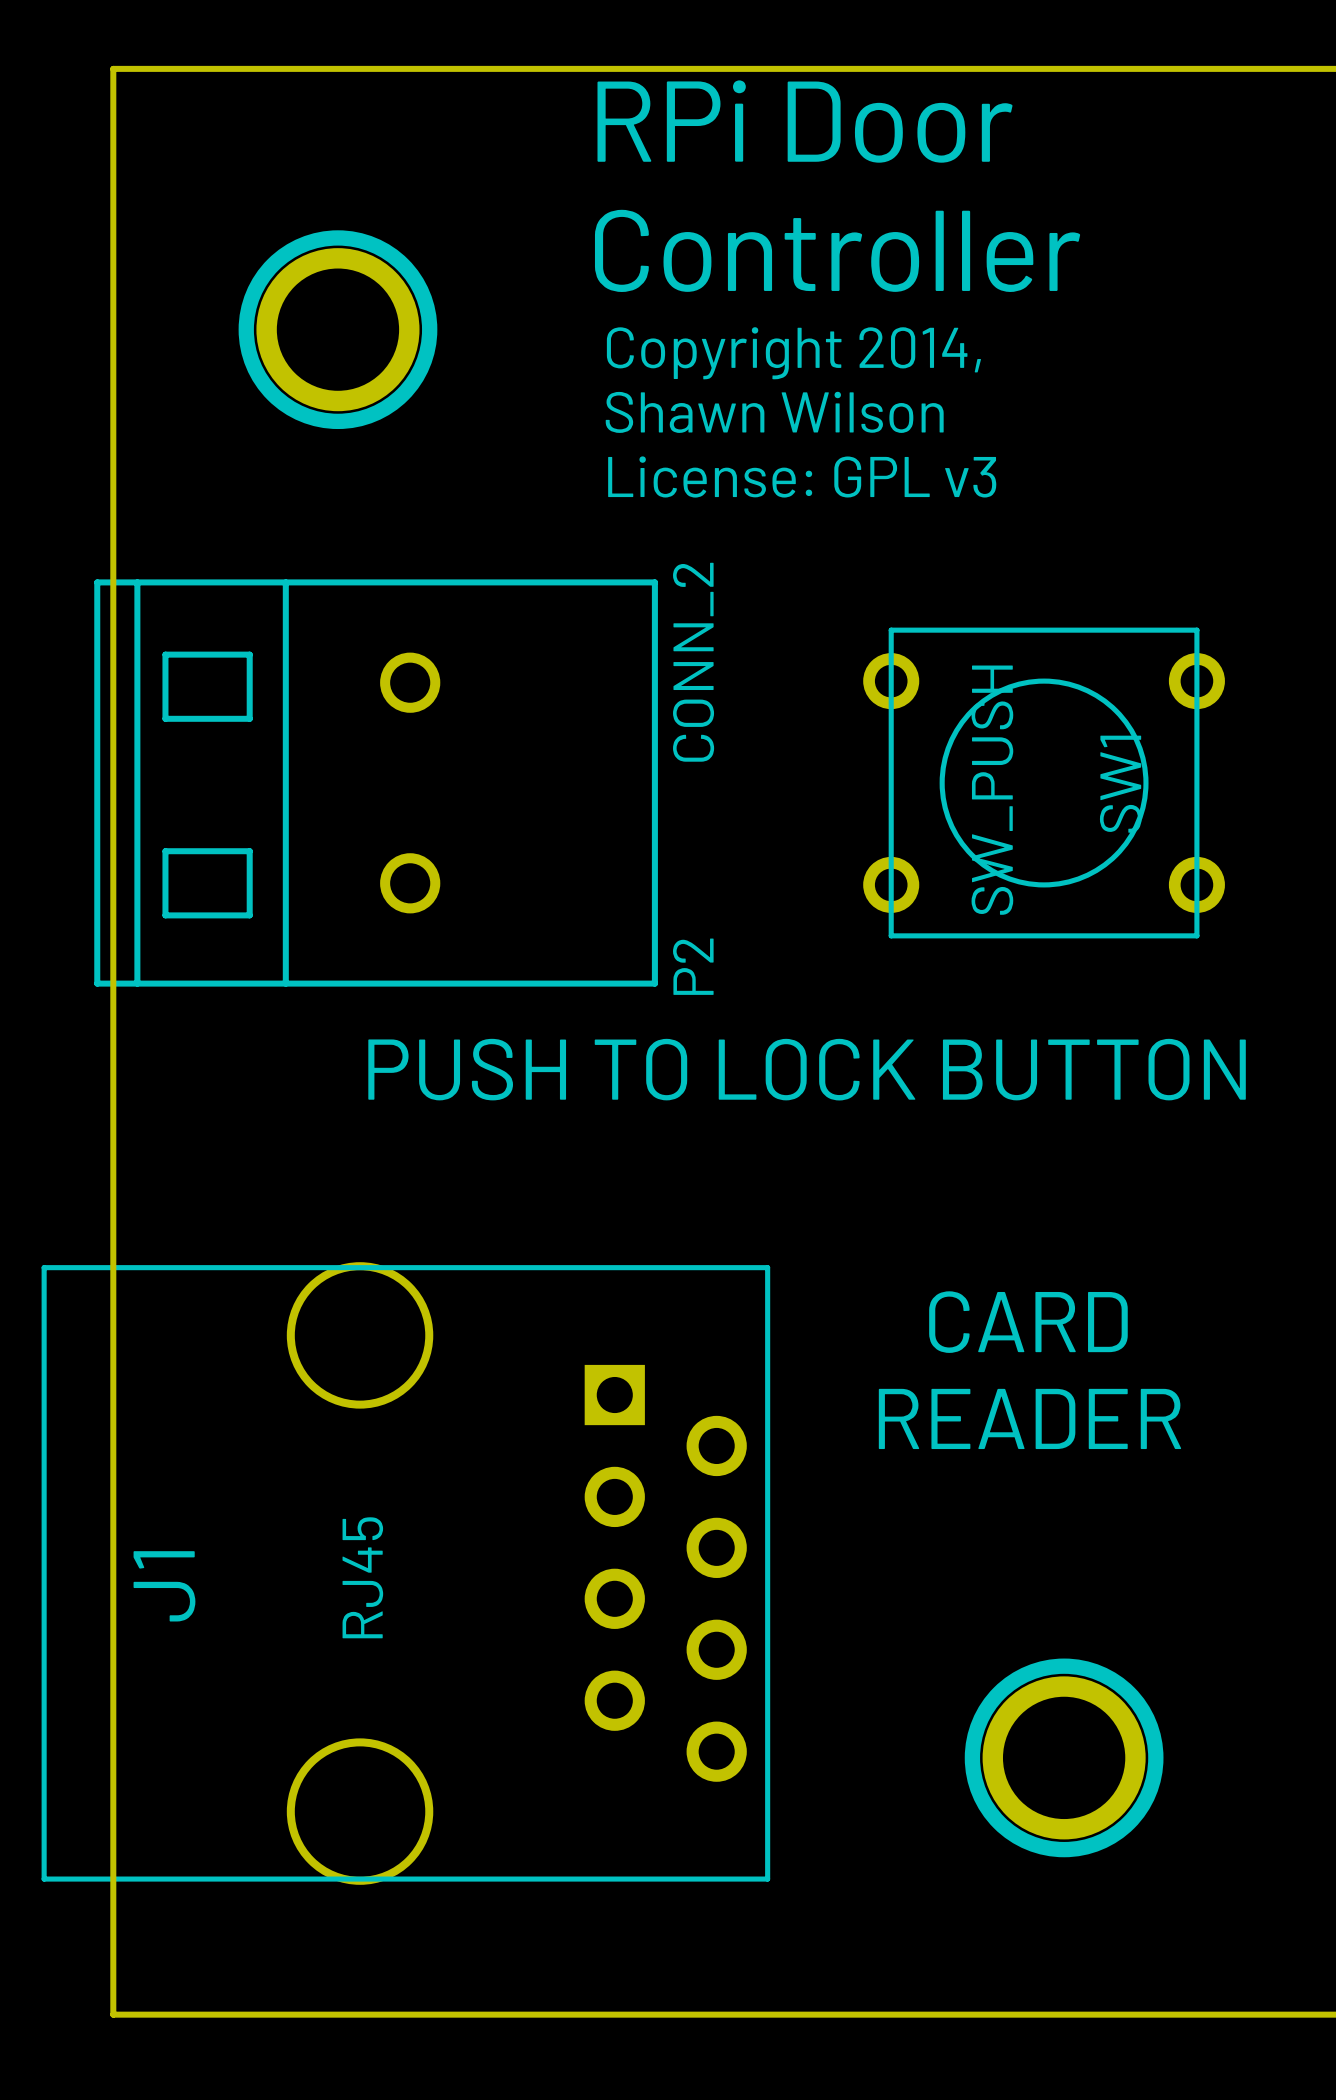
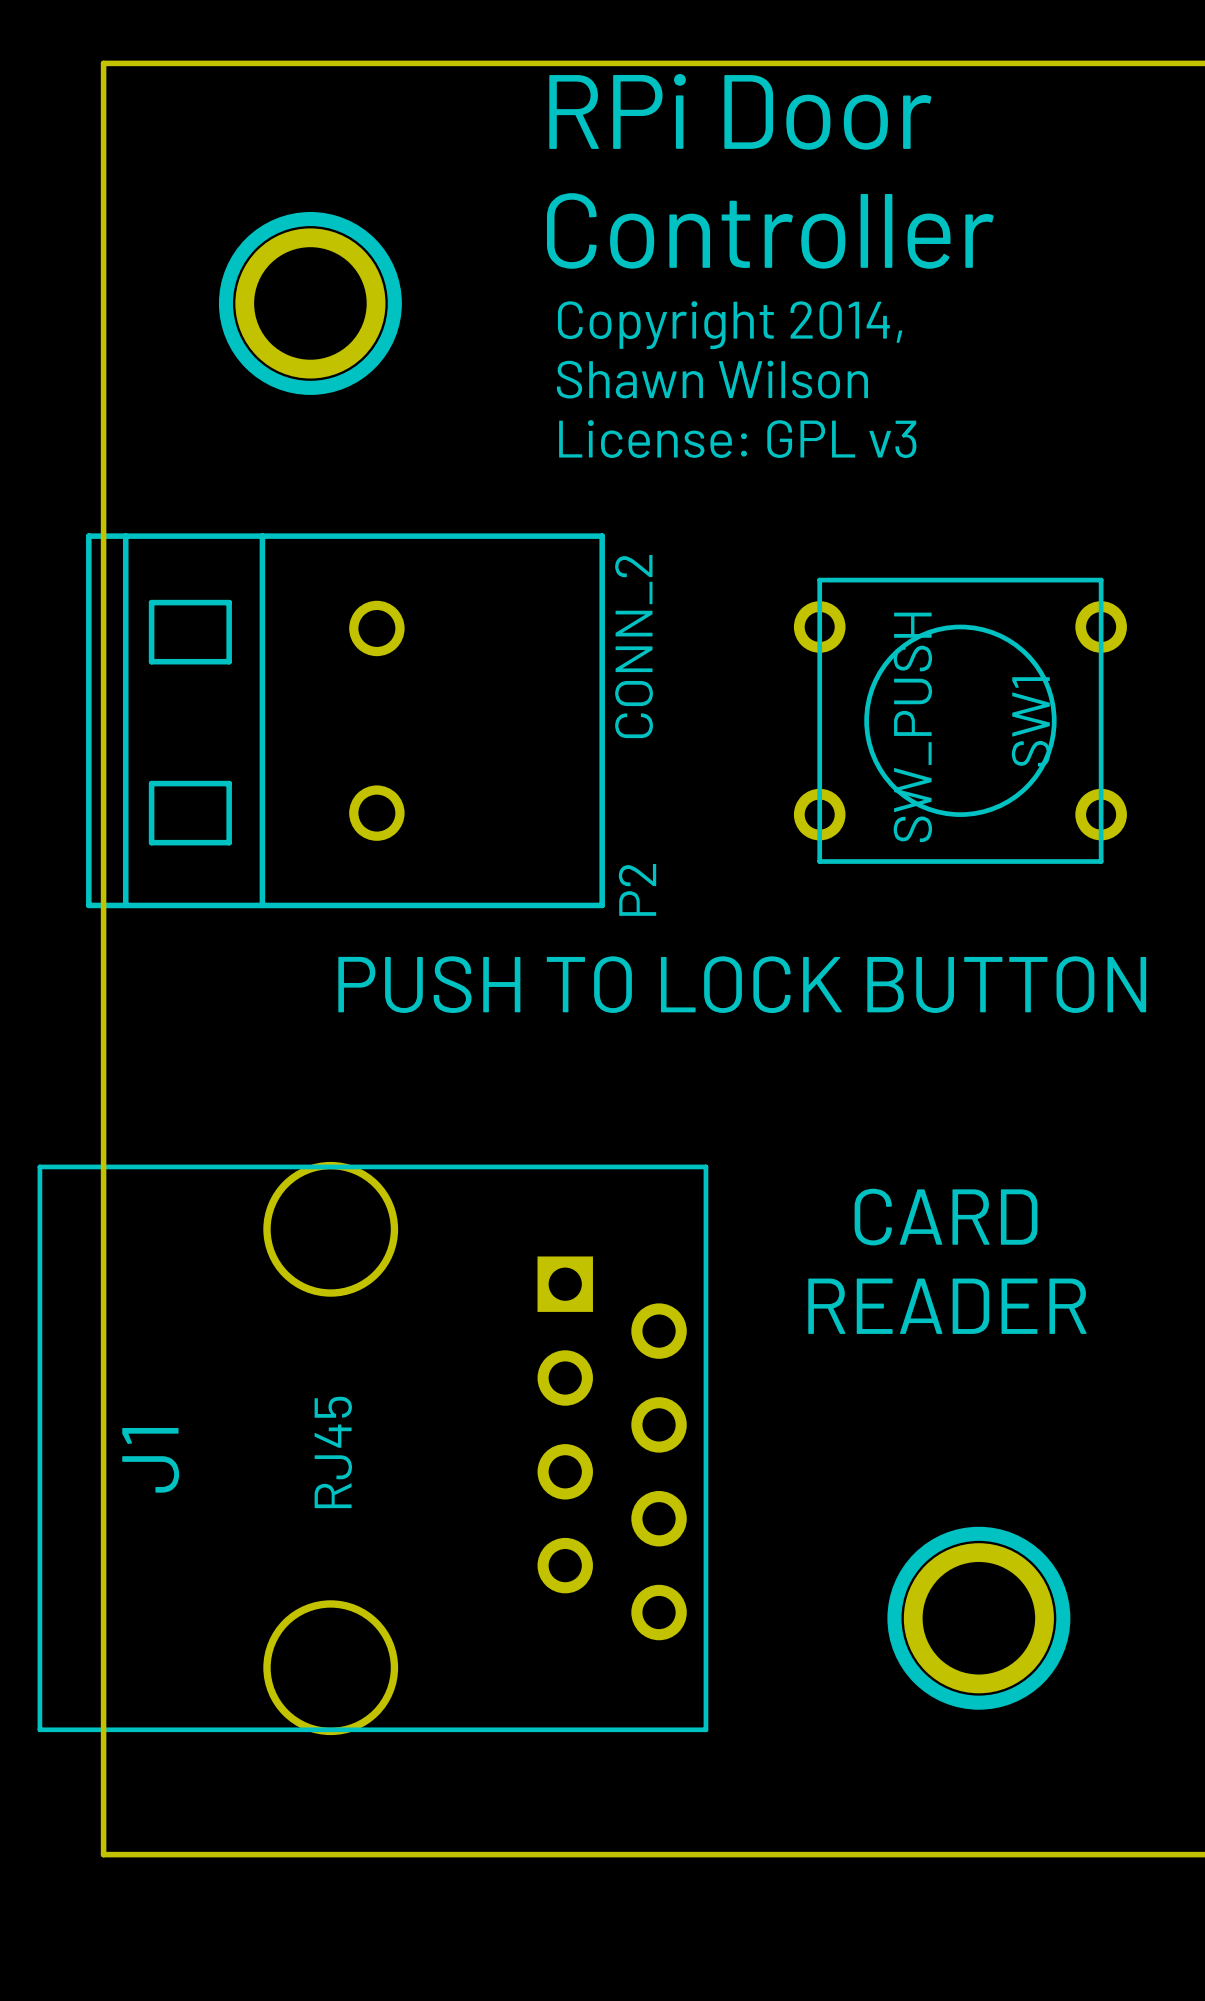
P2 value position: CONN_2 (693, 662) -> CONN_2 (634, 646)

